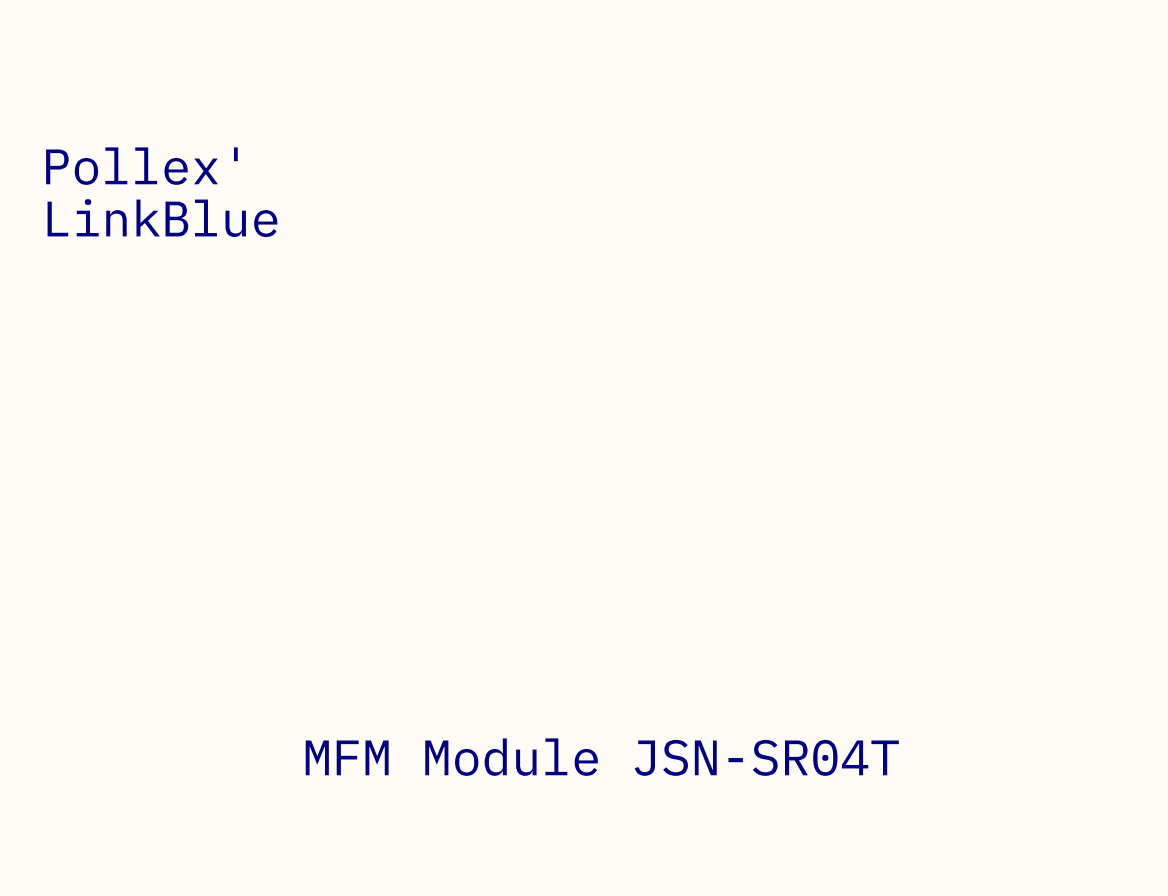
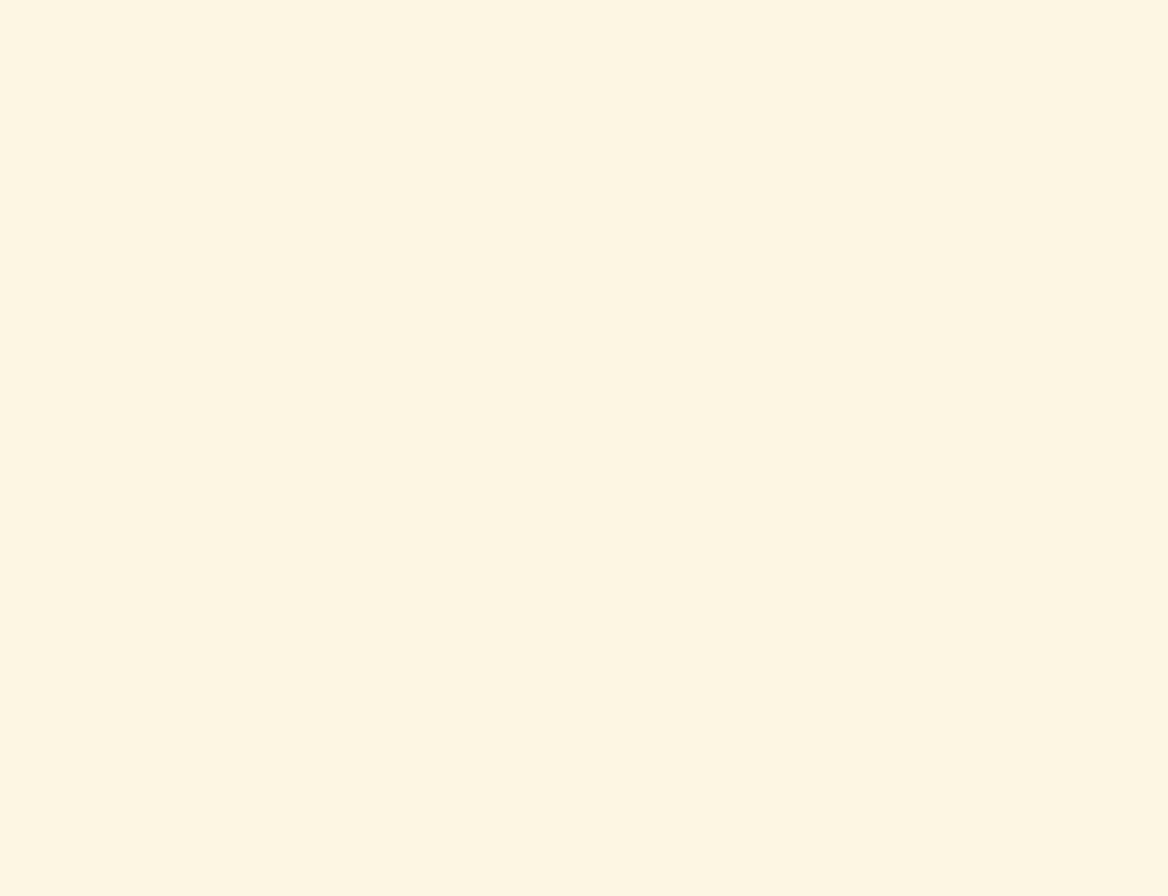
text: Pollex' (141, 166) -> none
text: LinkBlue (162, 218) -> none
text: MFM Module JSN-SR04T (602, 757) -> none

